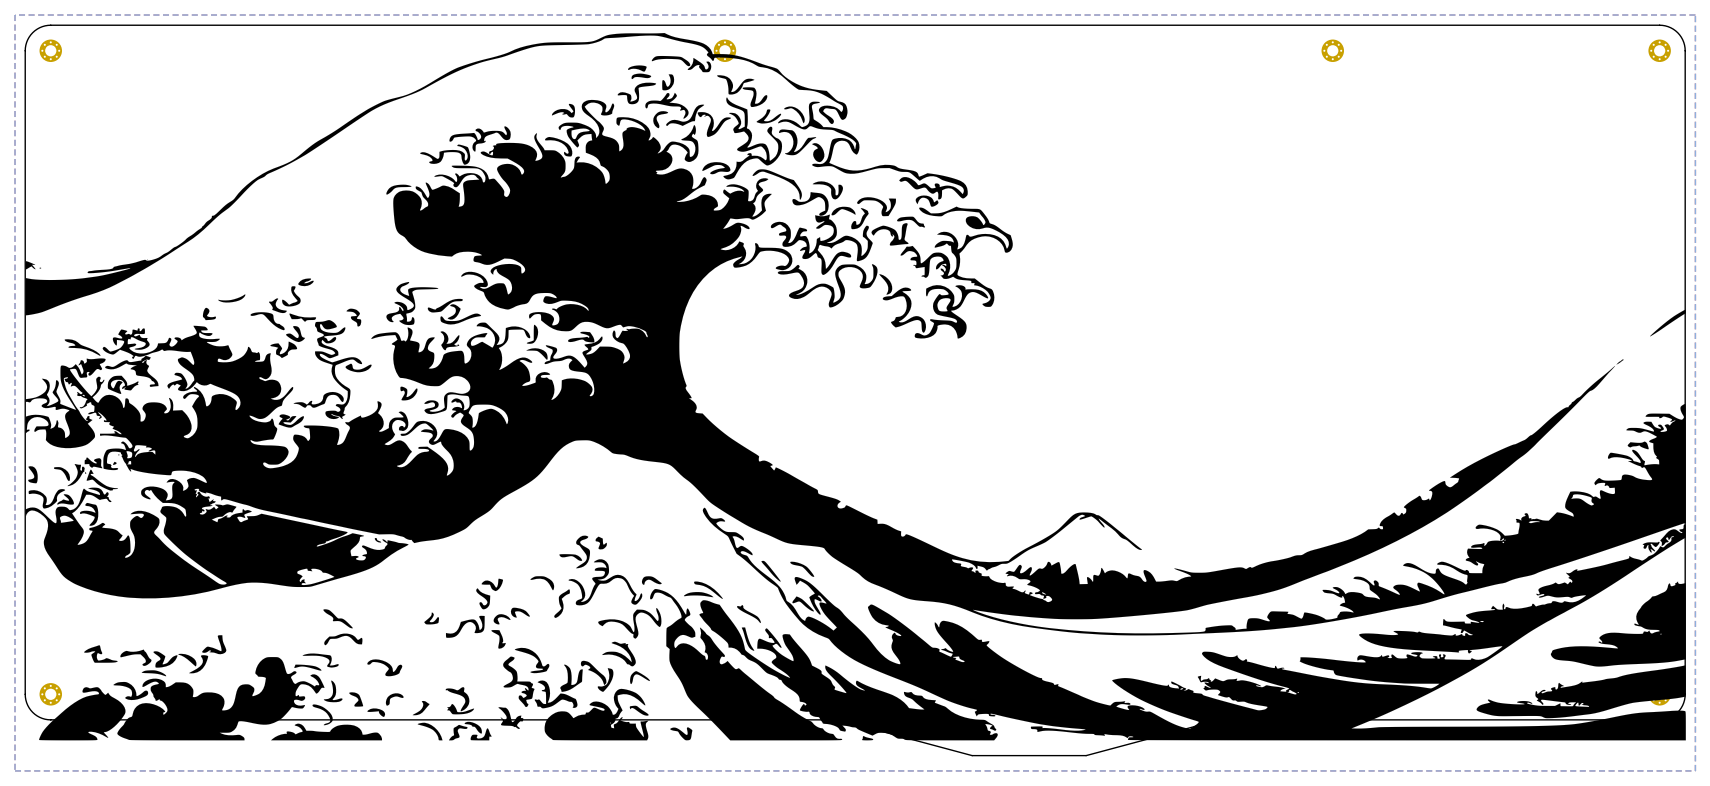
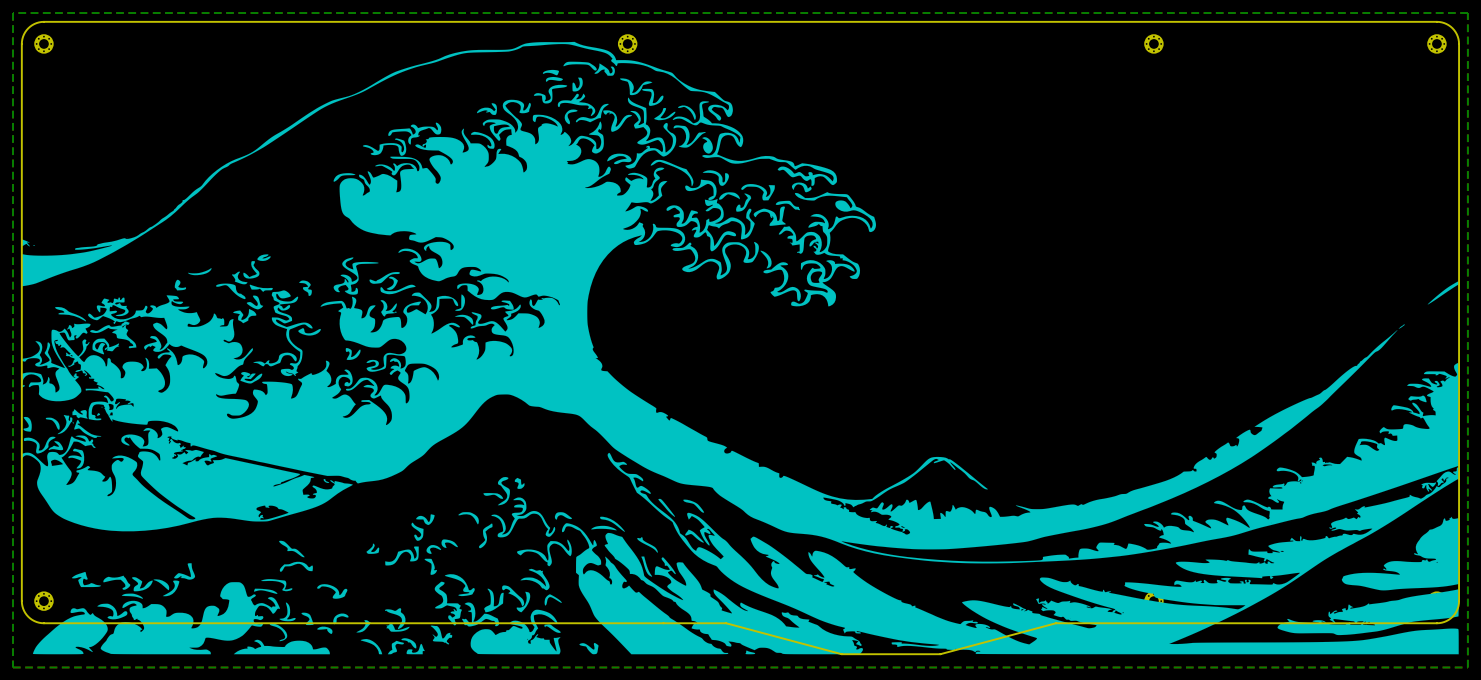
drawing position: (855, 386) -> (740, 348)

